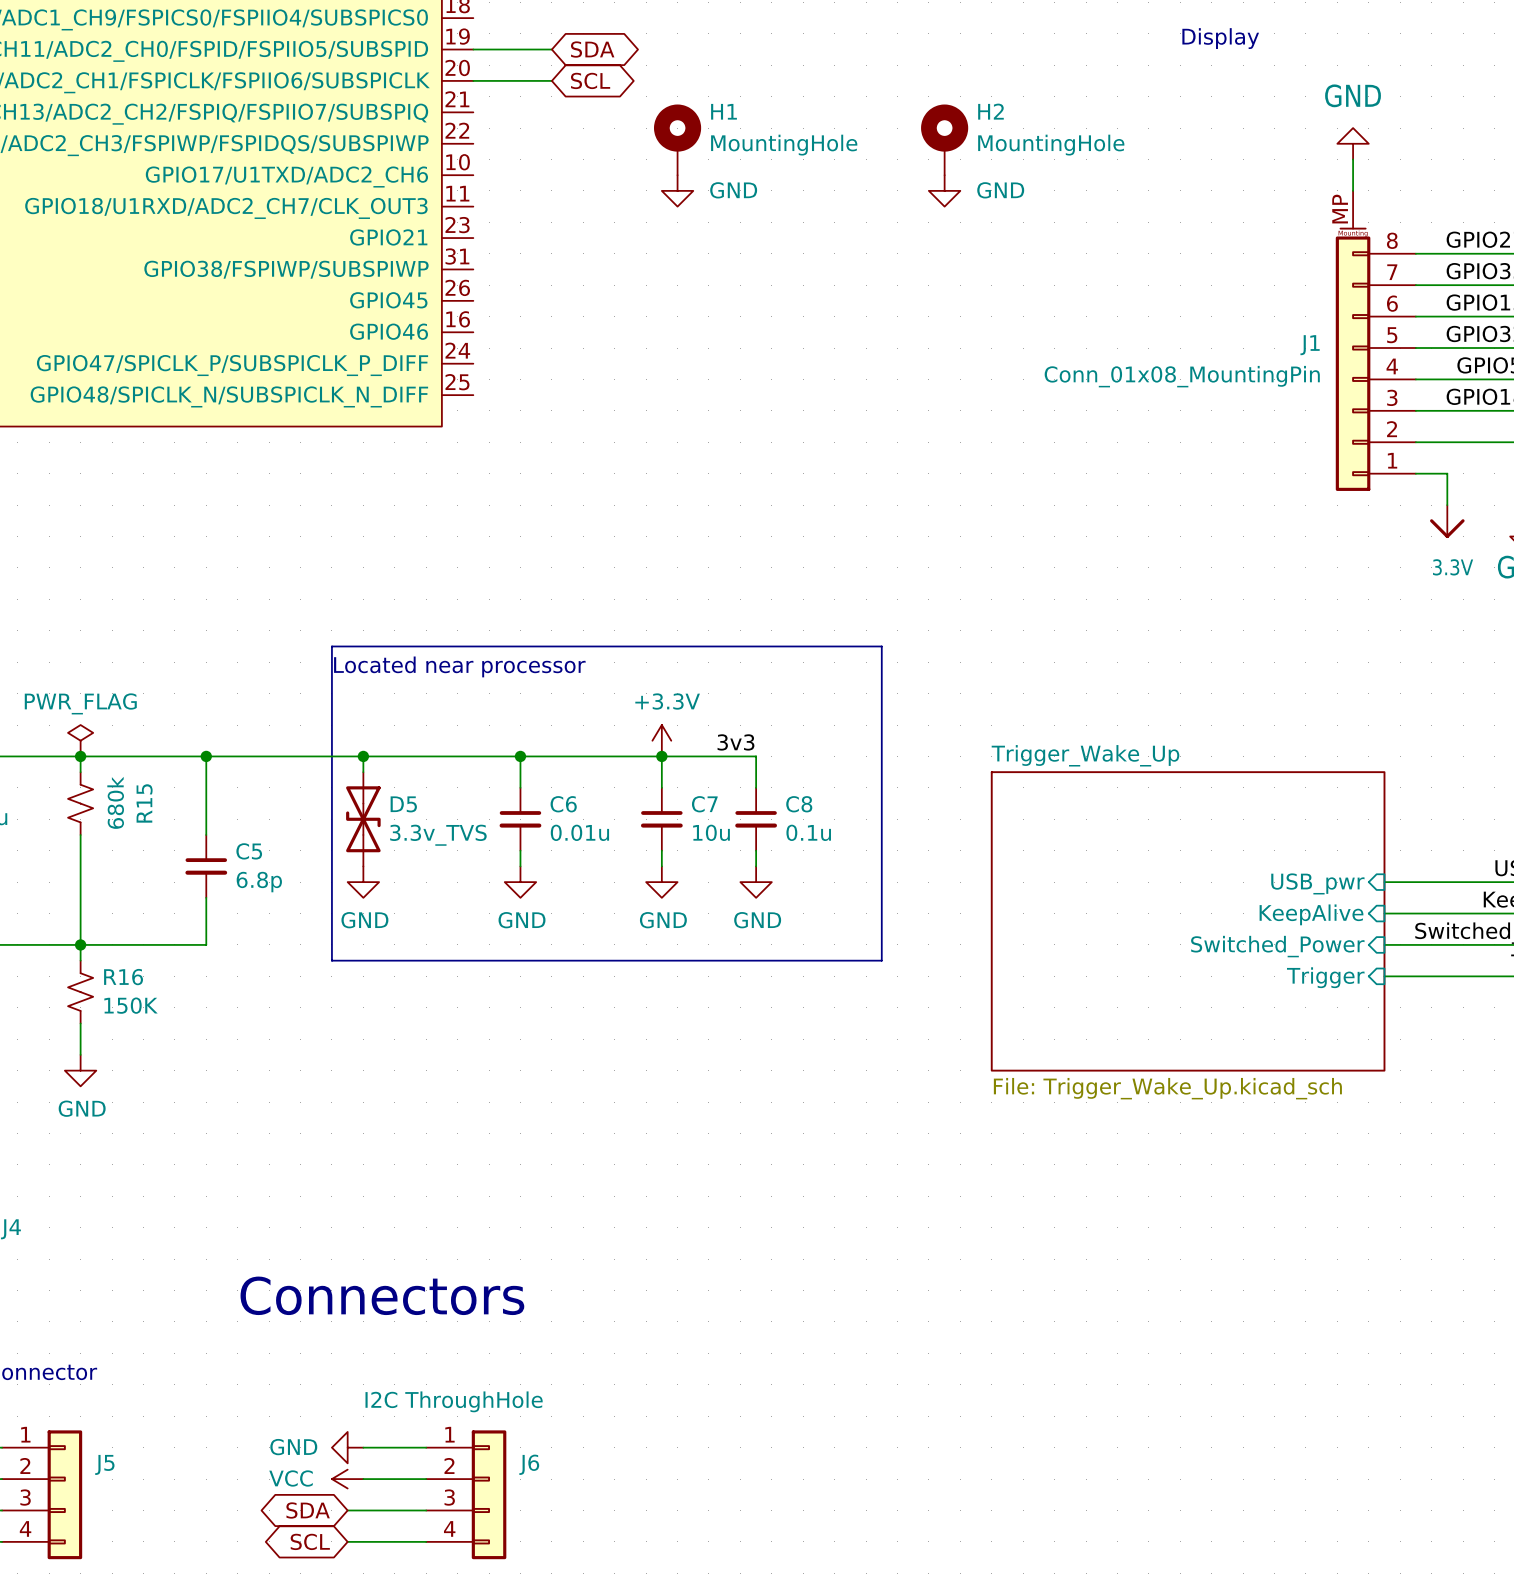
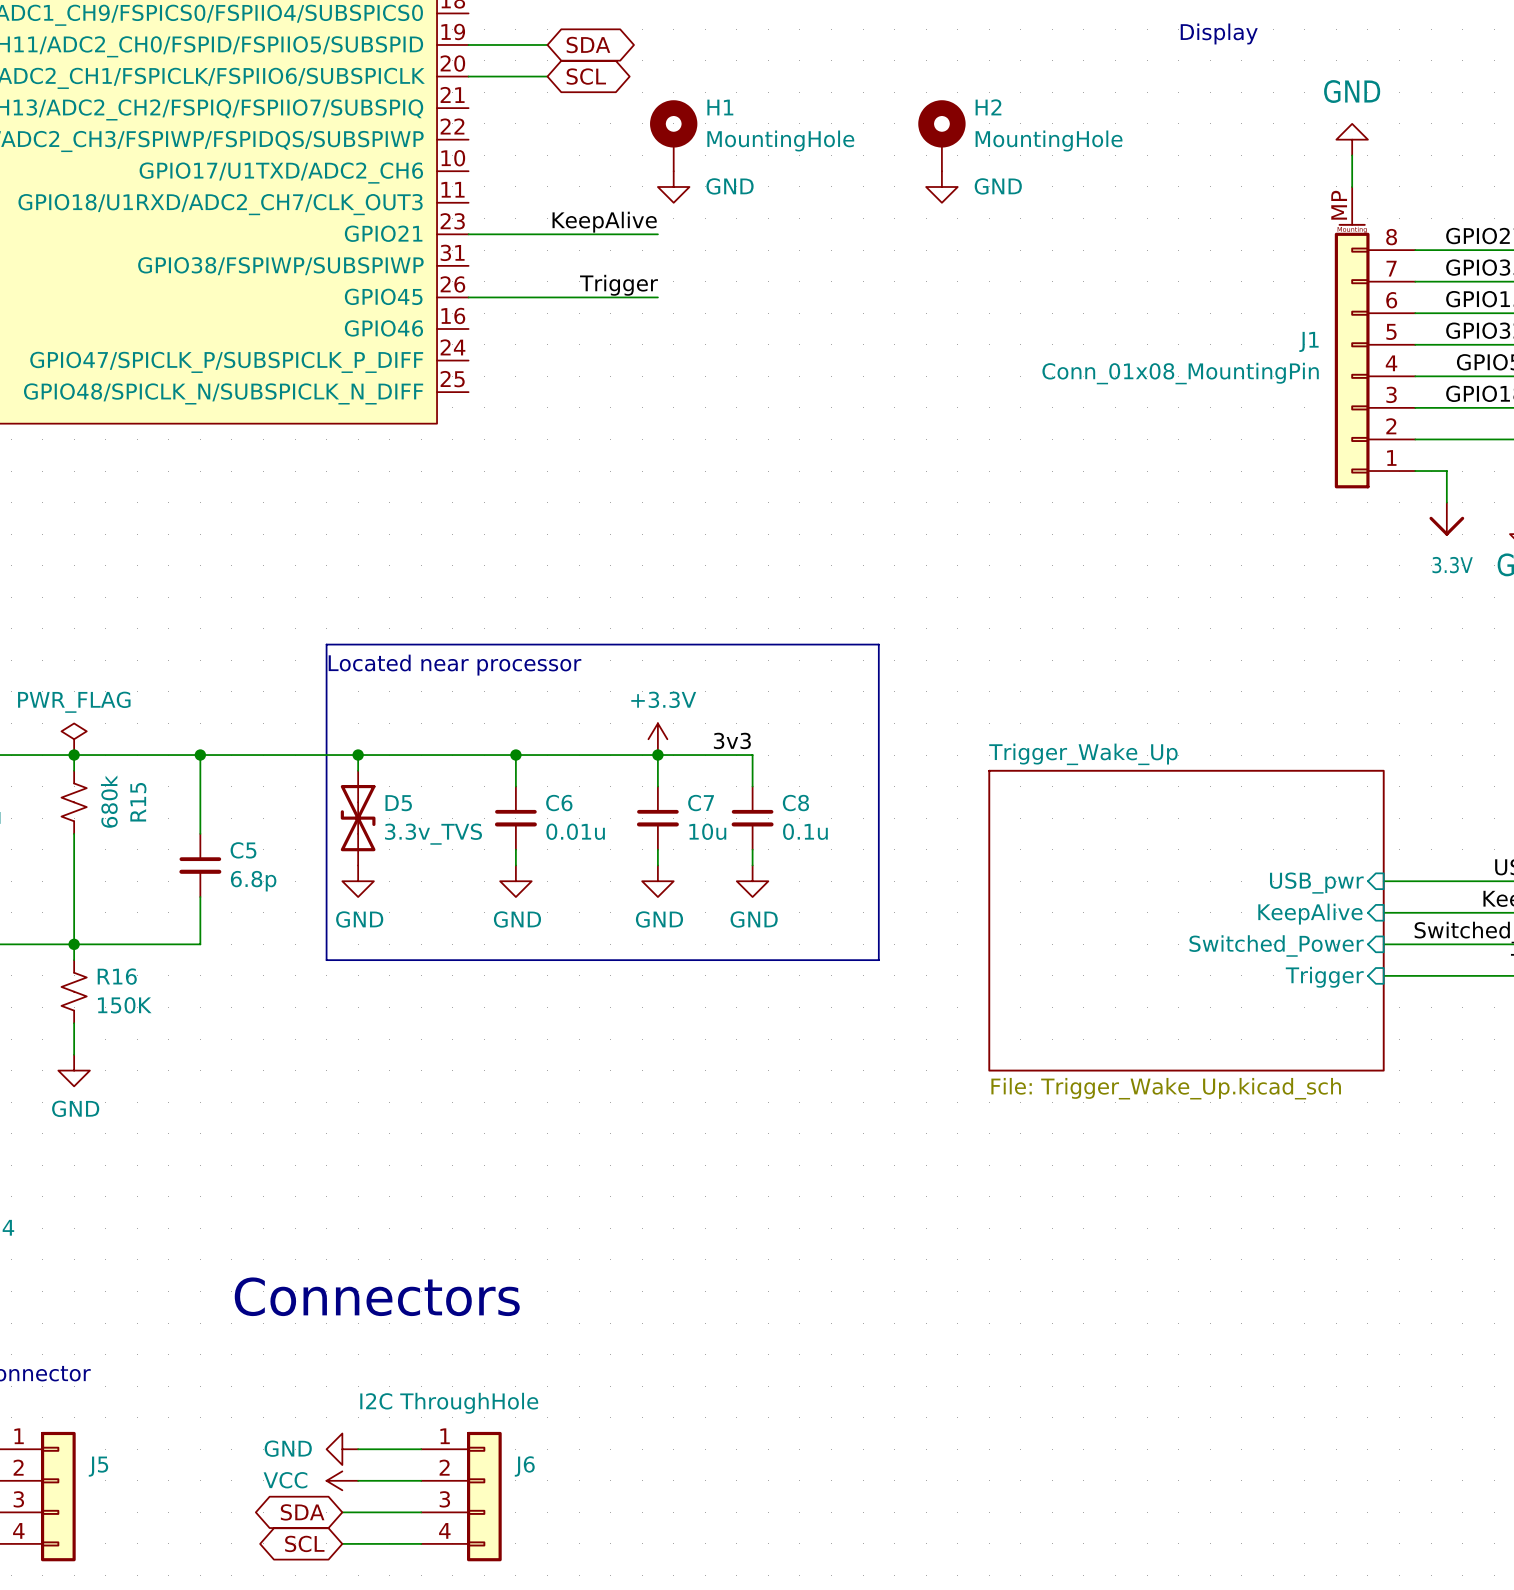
label: none -> KeepAlive (604, 222)
wire: none -> (468, 234) (657, 234)
label: none -> Trigger (618, 285)
wire: none -> (468, 297) (657, 297)

